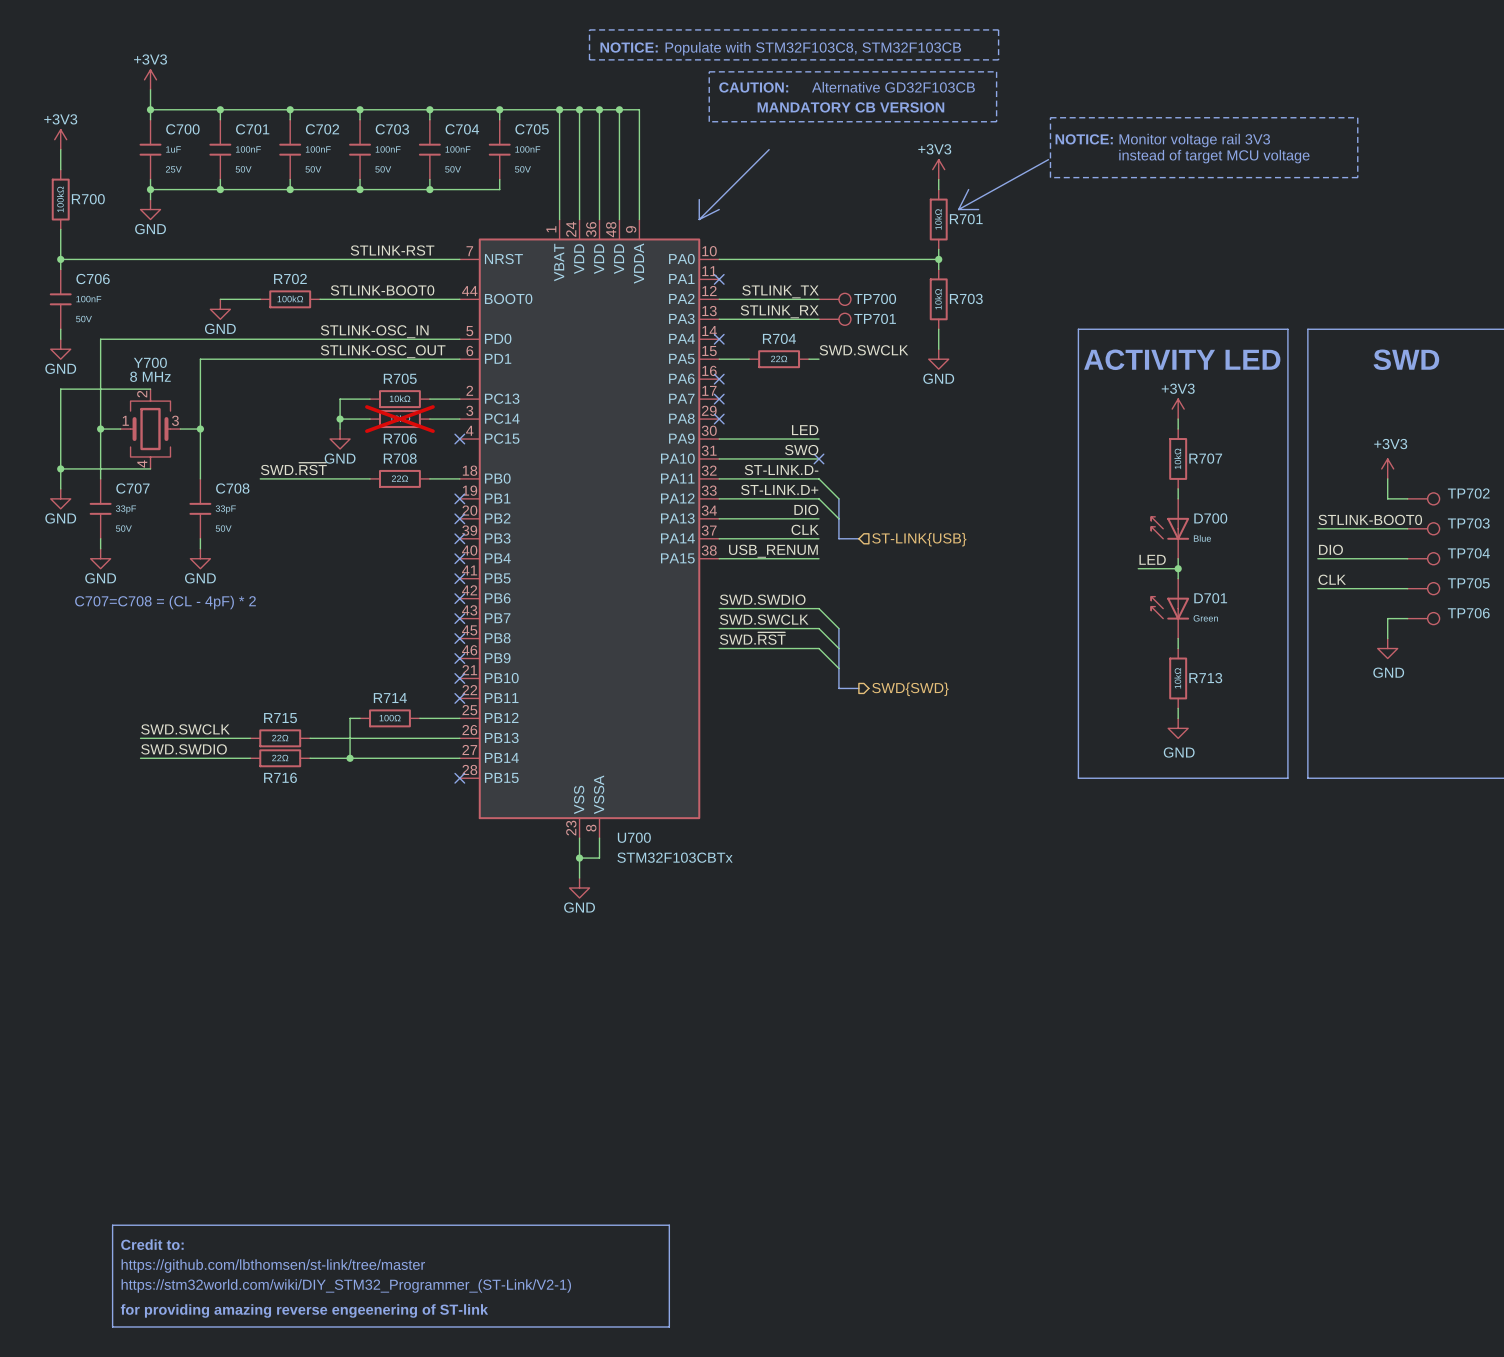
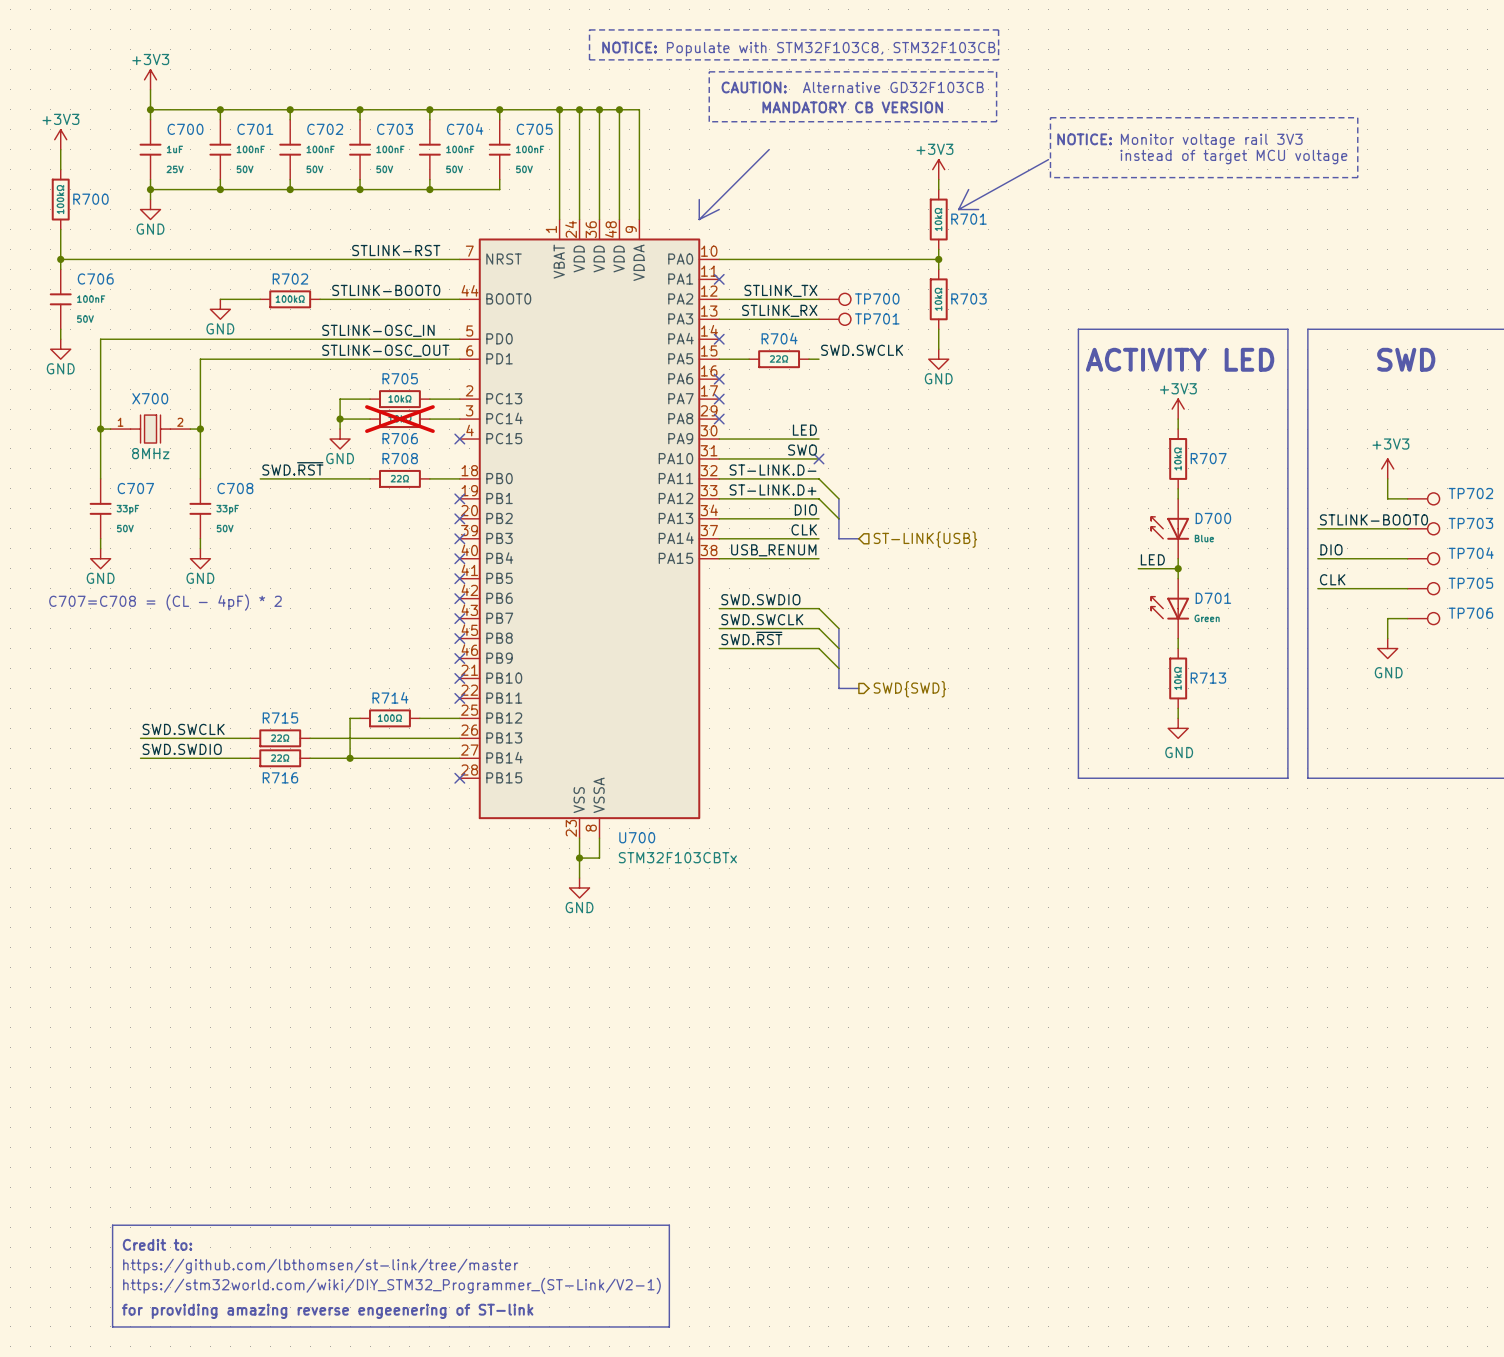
wire: (150, 389) (60, 389) (60, 488) -> none
Y700: 8 MHz (150, 429) -> none
X700: none -> (150, 429)
wire: (60, 468) (150, 468) -> none
junction: (60, 468) -> none
power symbol: GND (60, 498) -> none

